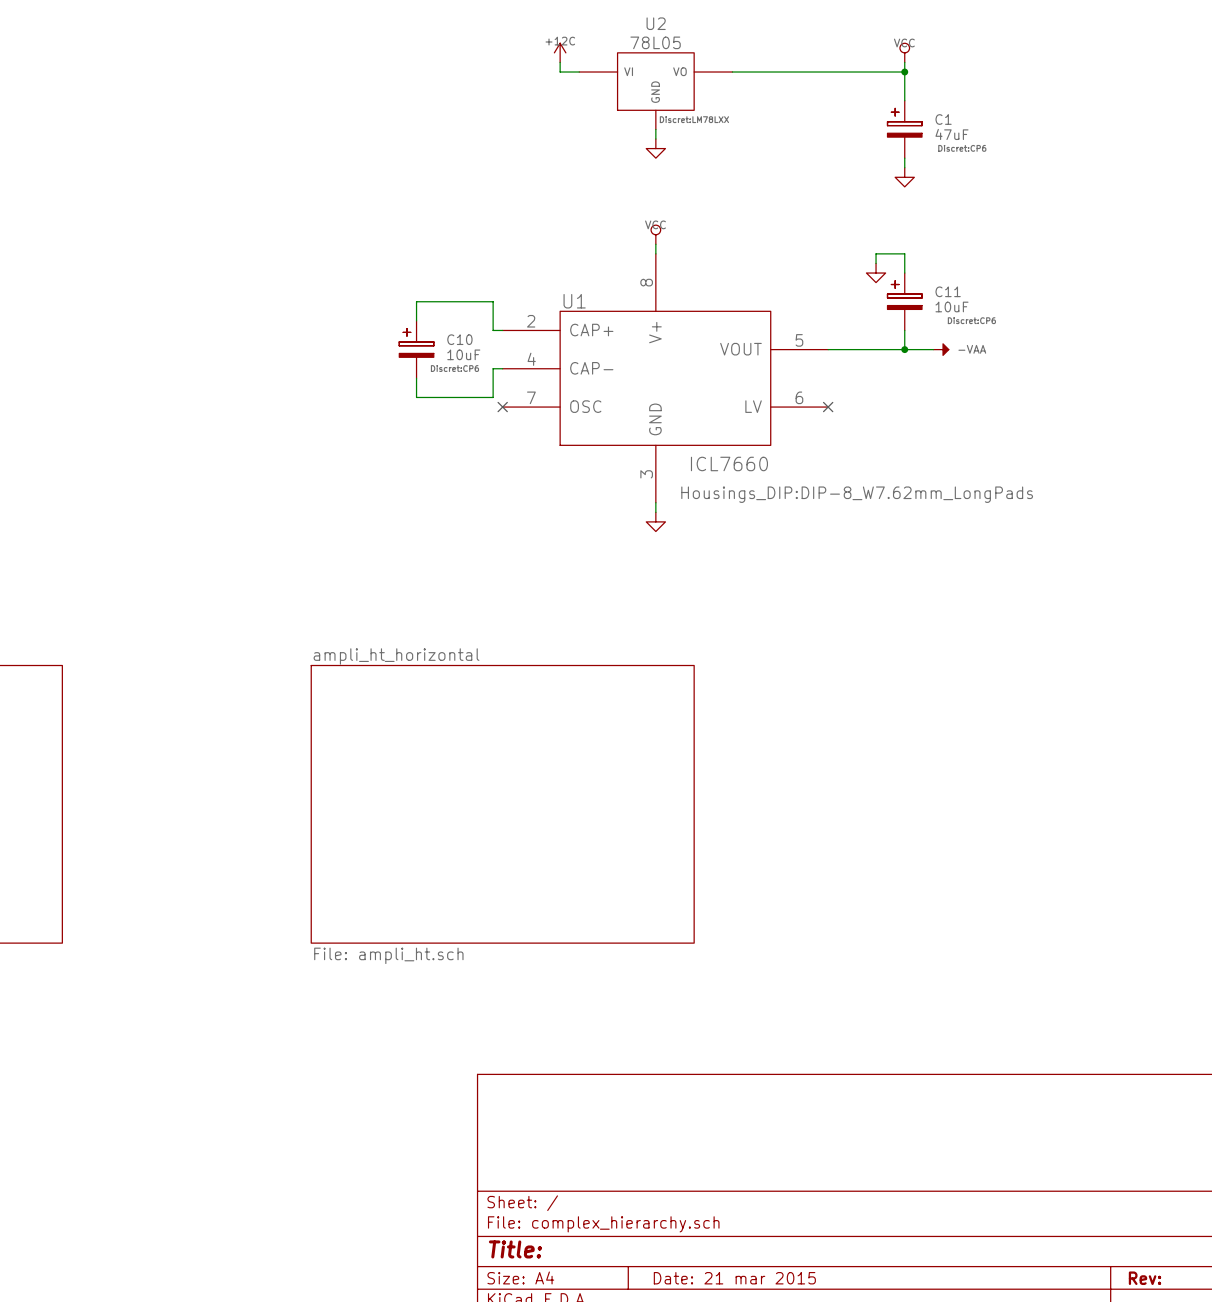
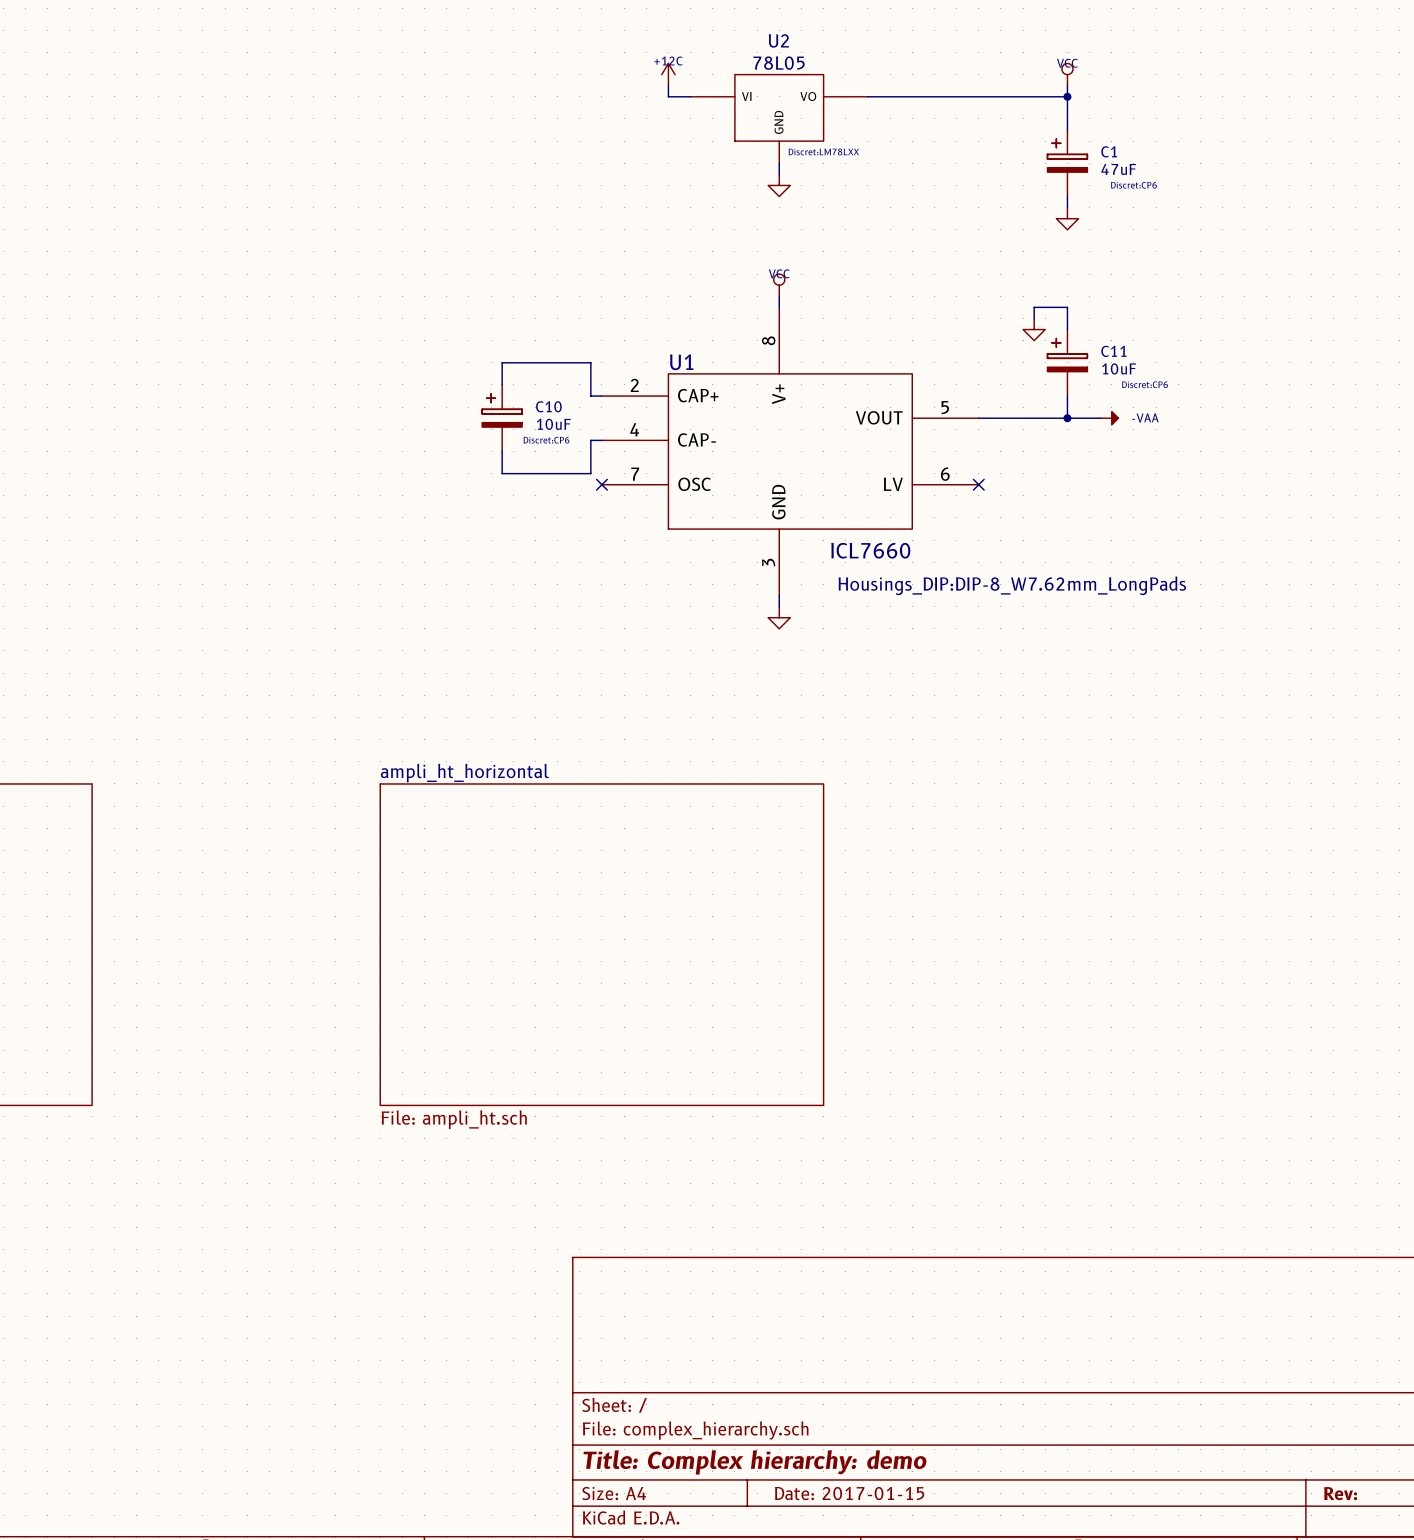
title block: Title: (515, 1249) -> Title: Complex hierarchy: demo (755, 1462)
title block: Date: 21 mar 2015 (734, 1278) -> Date: 2017-01-15 (849, 1493)

